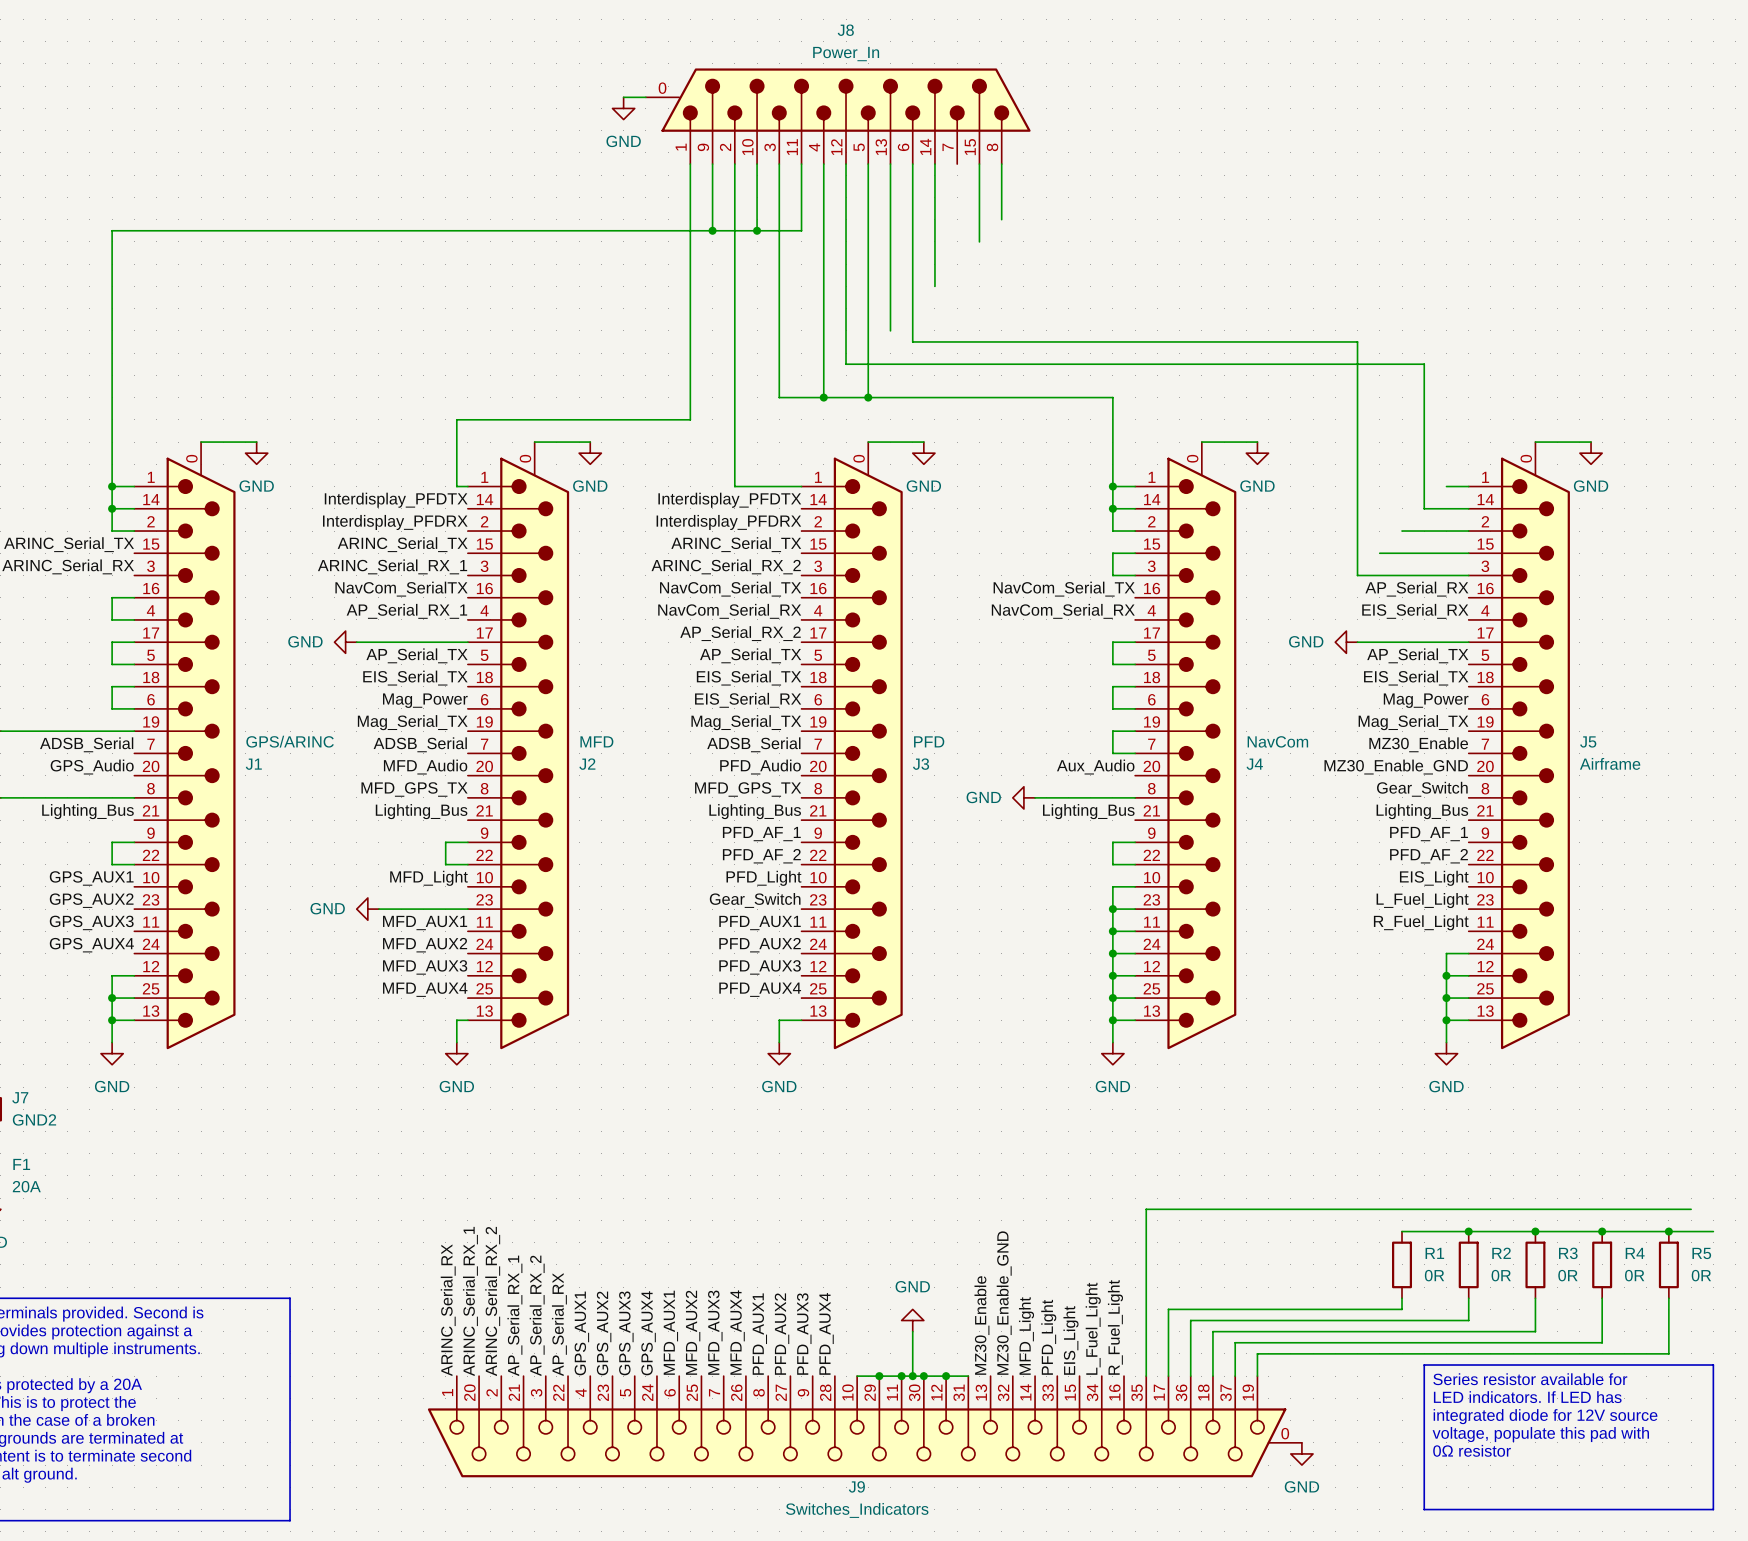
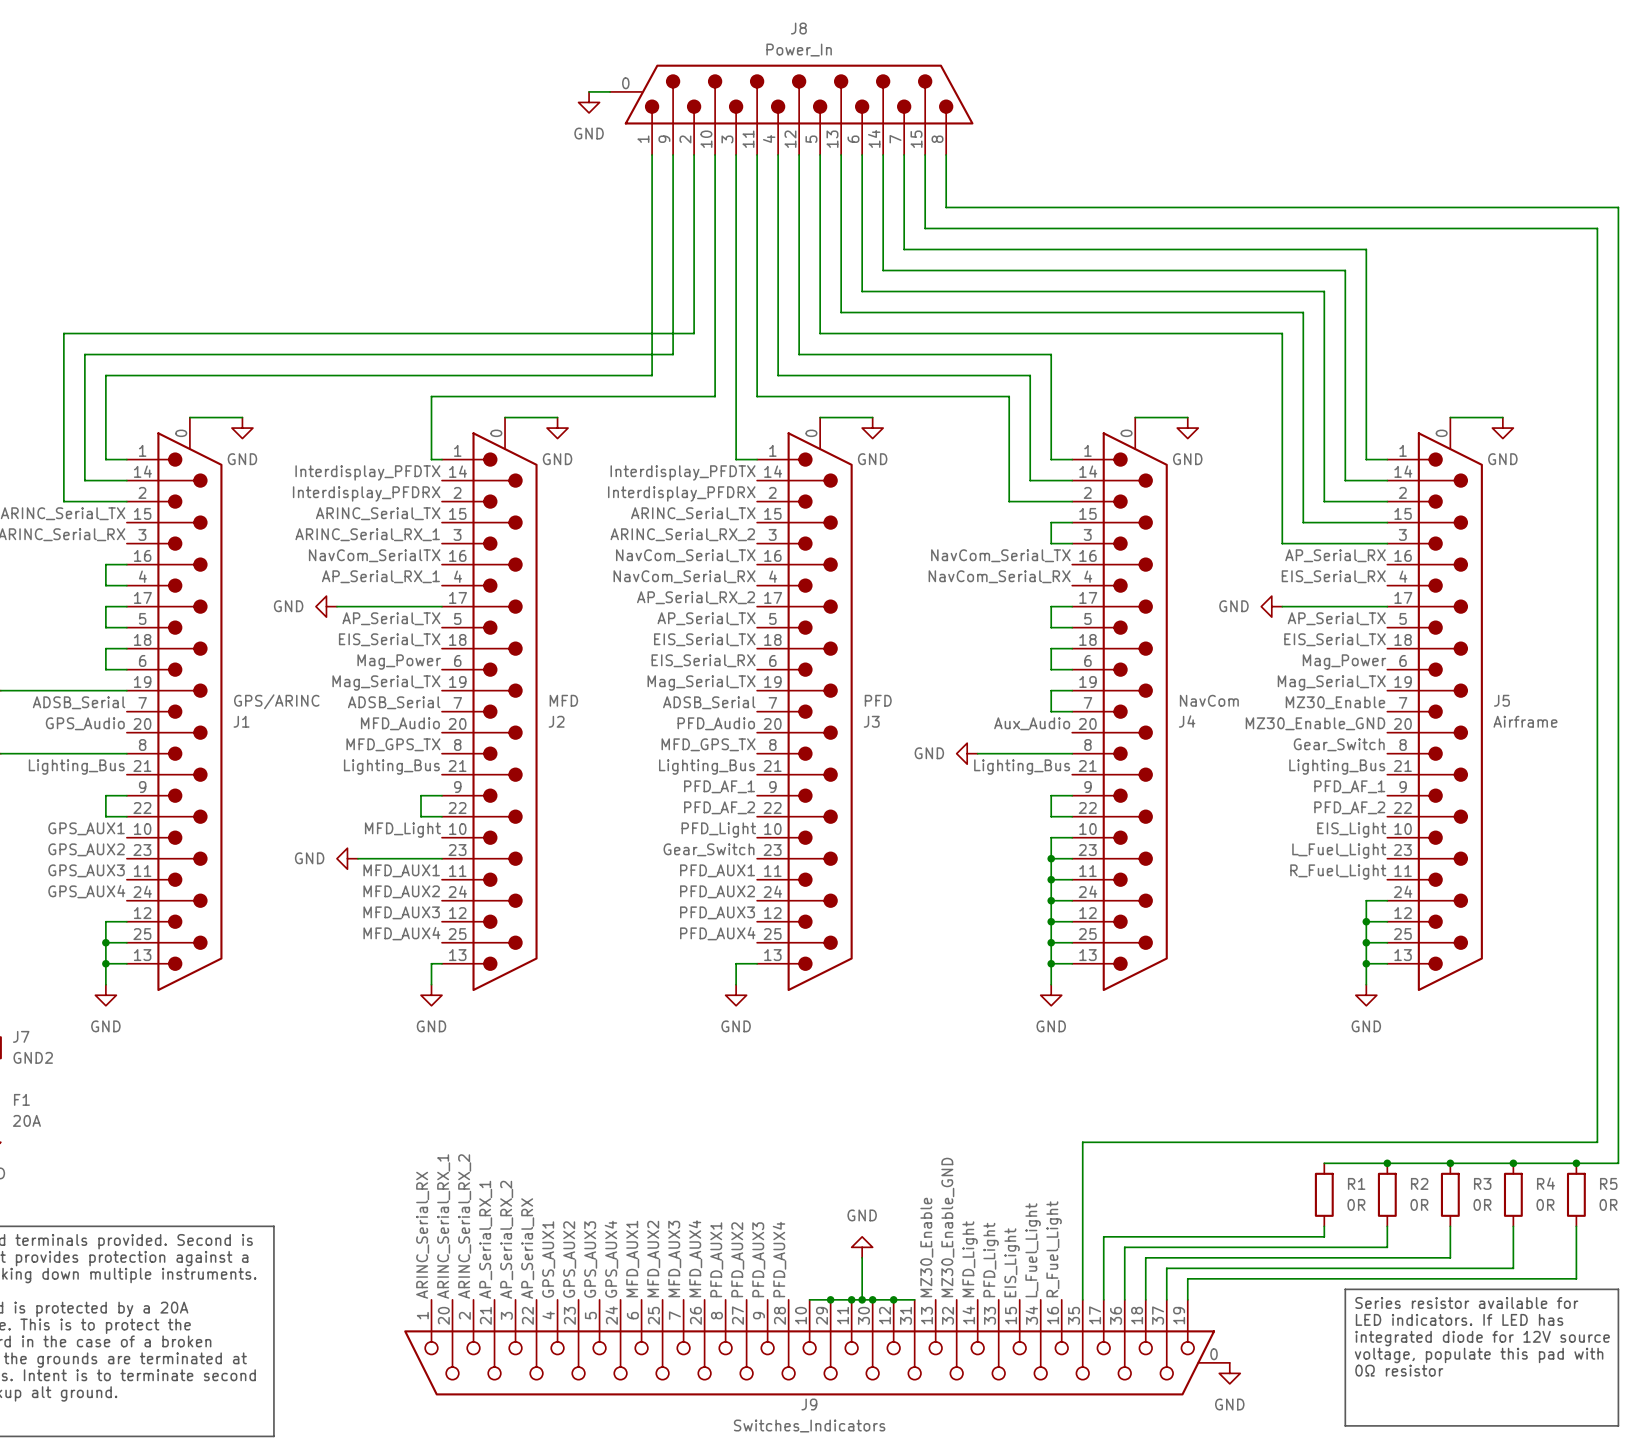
wire: none -> (904, 154) (904, 249) (1366, 249) (1366, 459)
wire: none -> (946, 207) (1618, 207) (1618, 1163)
wire: none -> (673, 217) (673, 354) (84, 354) (84, 480) (105, 480)
junction: (712, 230) -> none
junction: (757, 230) -> none
wire: (801, 230) (112, 230) (112, 397) -> (652, 375) (105, 375)
wire: none -> (925, 228) (1597, 228) (1597, 1142)
wire: (912, 308) (912, 341) (1357, 341) (1357, 353) -> (820, 333) (1282, 333)
wire: none -> (862, 291) (1324, 291) (1324, 501)
wire: none -> (841, 312) (1303, 312) (1303, 522)
wire: (734, 353) (734, 486) (779, 486) -> (736, 375) (736, 459)
wire: (868, 353) (868, 397) -> none
wire: (846, 364) (1424, 364) -> (883, 270) (1345, 270) (1345, 344)
wire: none -> (799, 344) (799, 354) (1051, 354) (1051, 375)
wire: (690, 397) (690, 419) -> (715, 217) (715, 396) (652, 396)
wire: (779, 397) (823, 397) -> none
junction: (823, 397) -> none
junction: (868, 397) -> none
wire: (1090, 397) (1112, 397) -> (1030, 375) (1030, 480) (1051, 480)
wire: (112, 486) (112, 531) -> (694, 333) (63, 333) (63, 501) (105, 501)
junction: (112, 486) -> none
wire: (1112, 486) (1112, 531) -> (757, 217) (757, 396) (1009, 396) (1009, 501) (1051, 501)
junction: (1112, 486) -> none
junction: (112, 508) -> none
junction: (1112, 508) -> none

